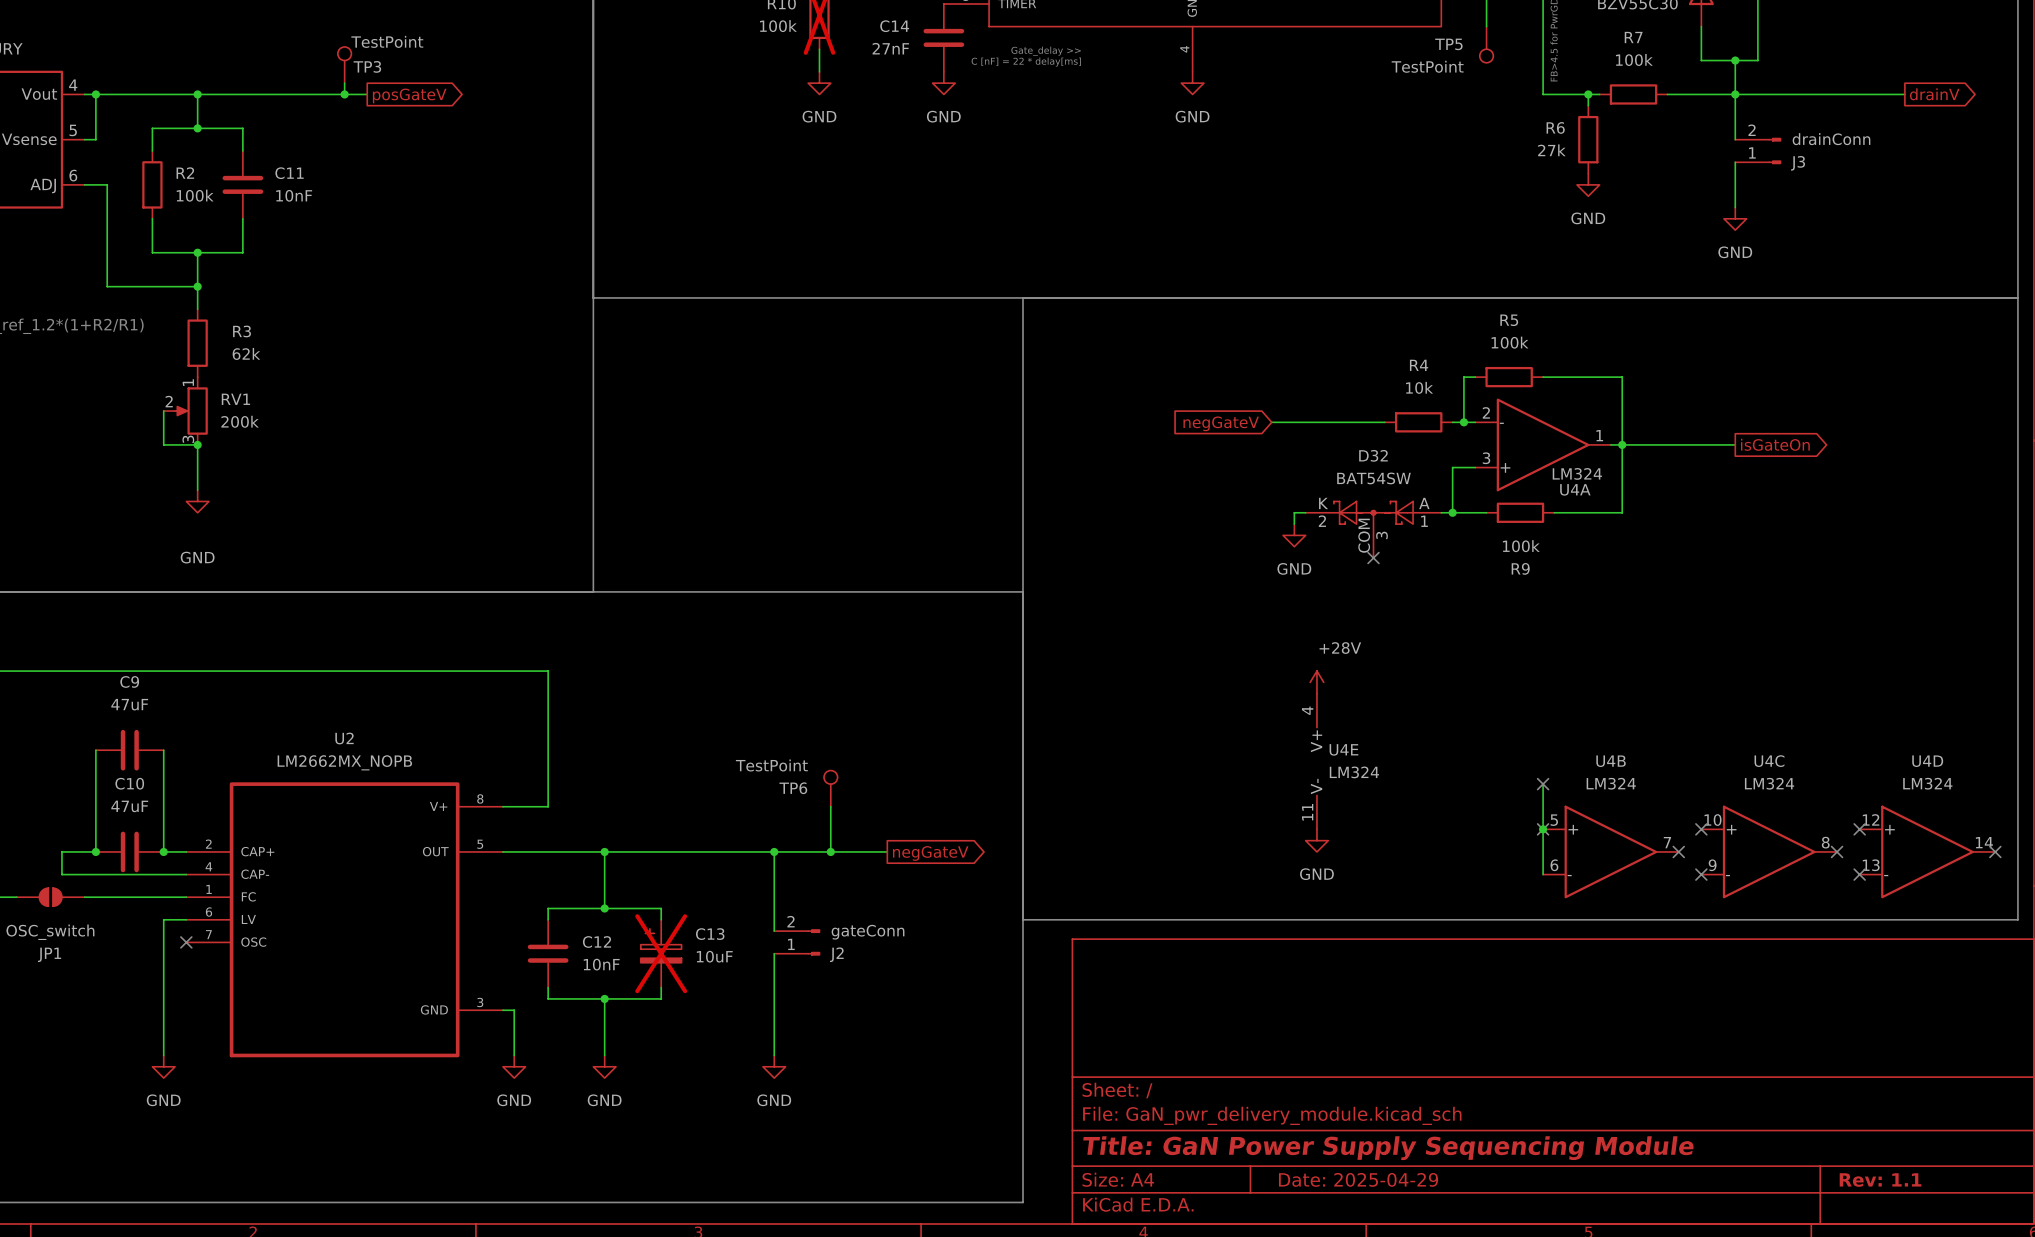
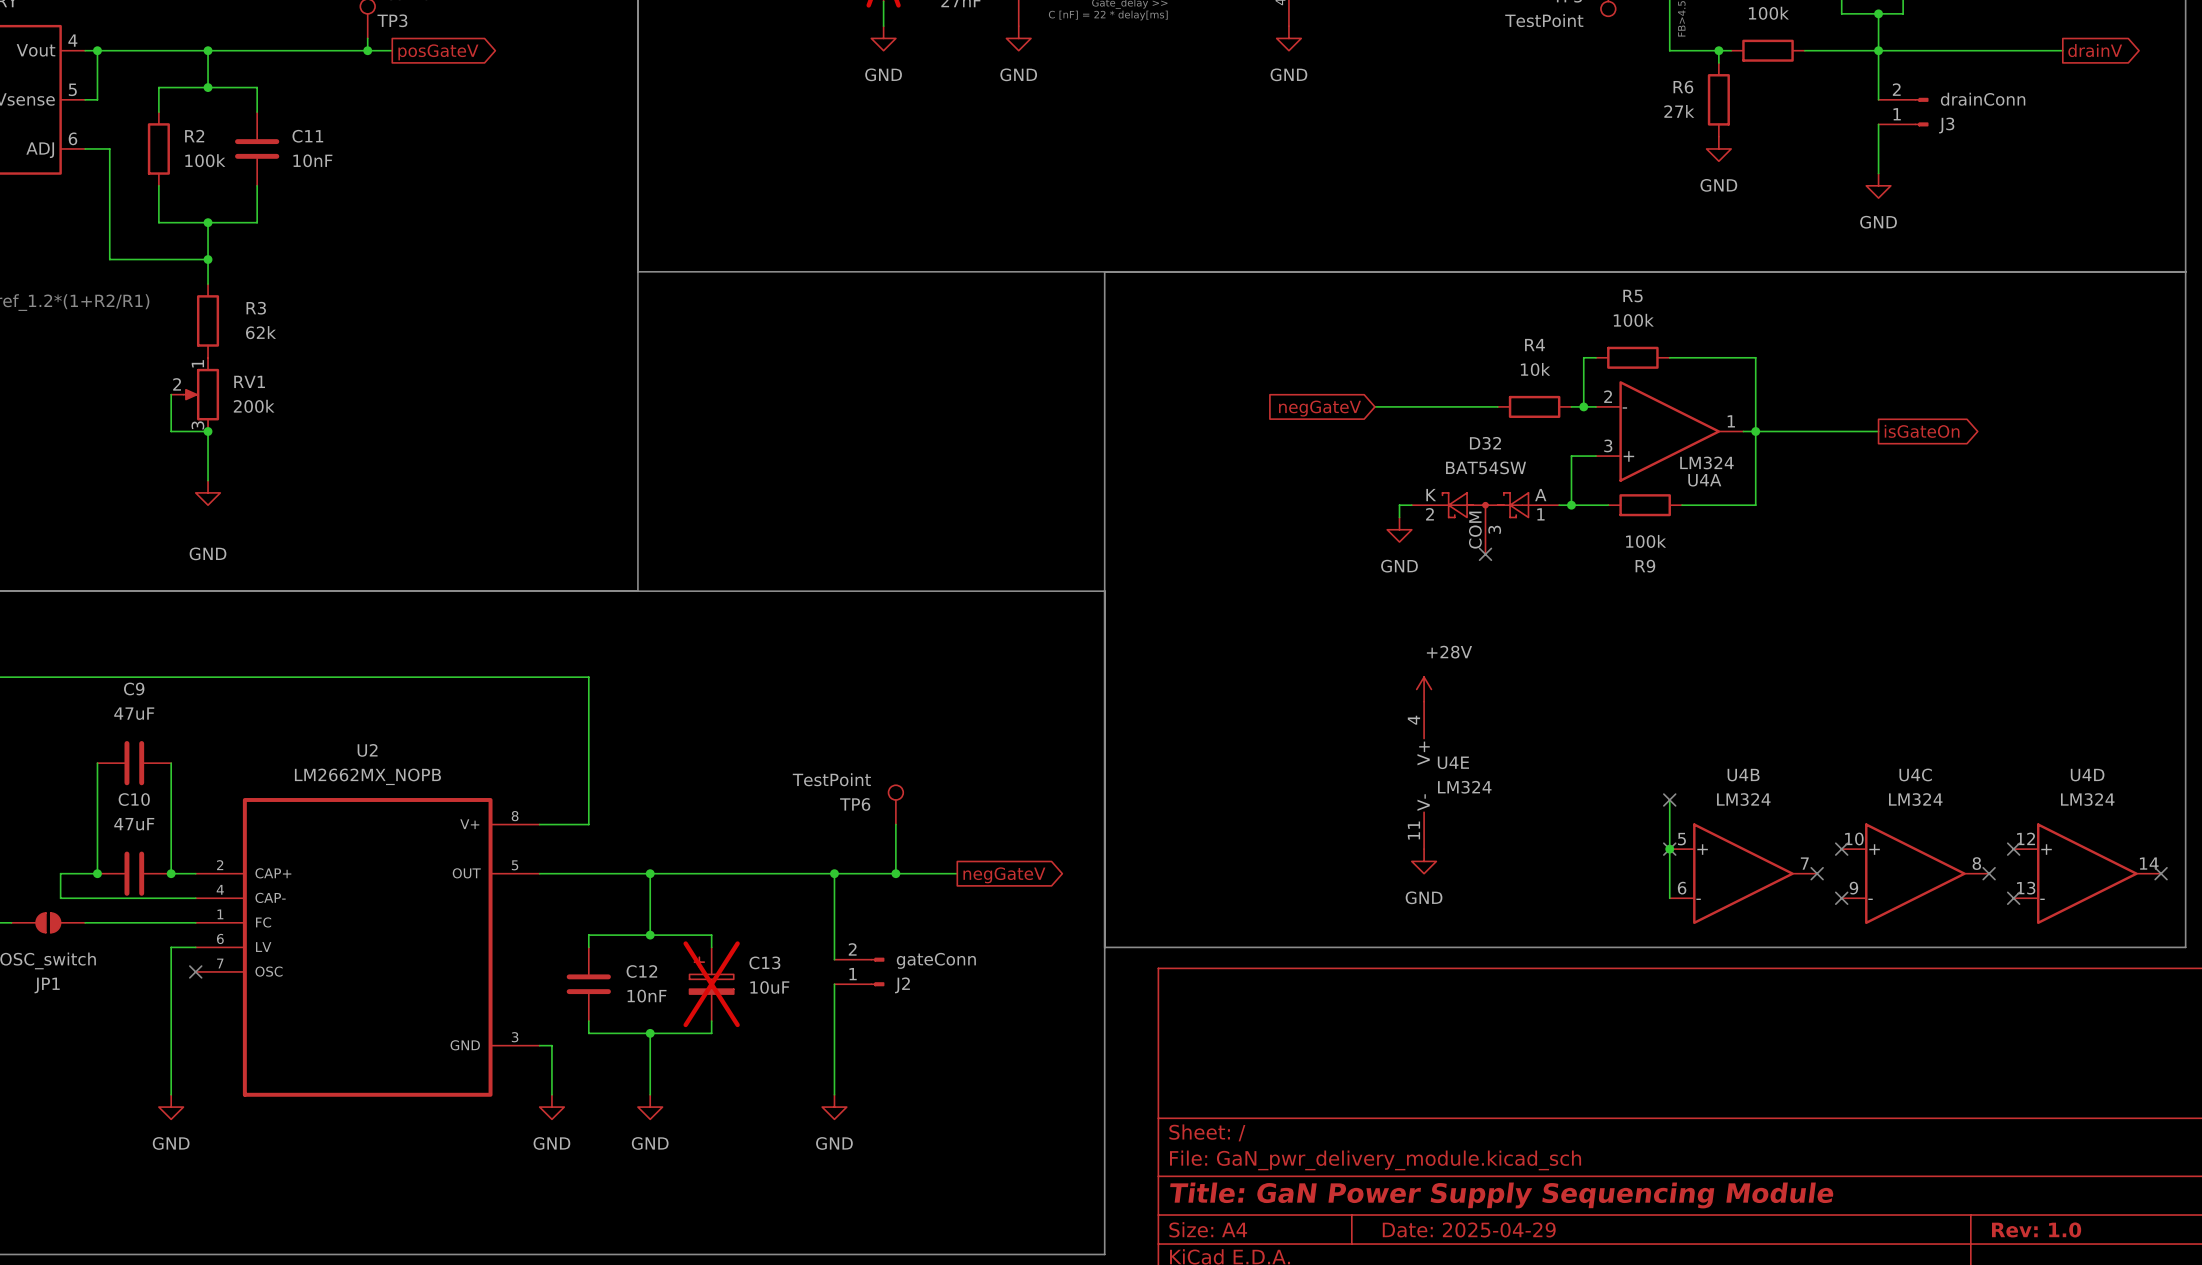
title block: Rev: 1.1 (1880, 1180) -> Rev: 1.0 (2036, 1229)

